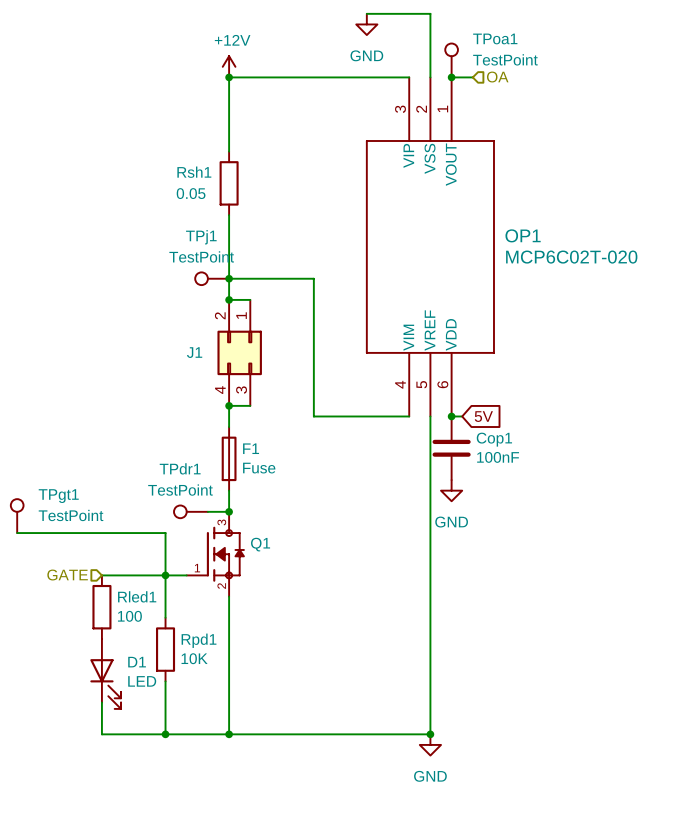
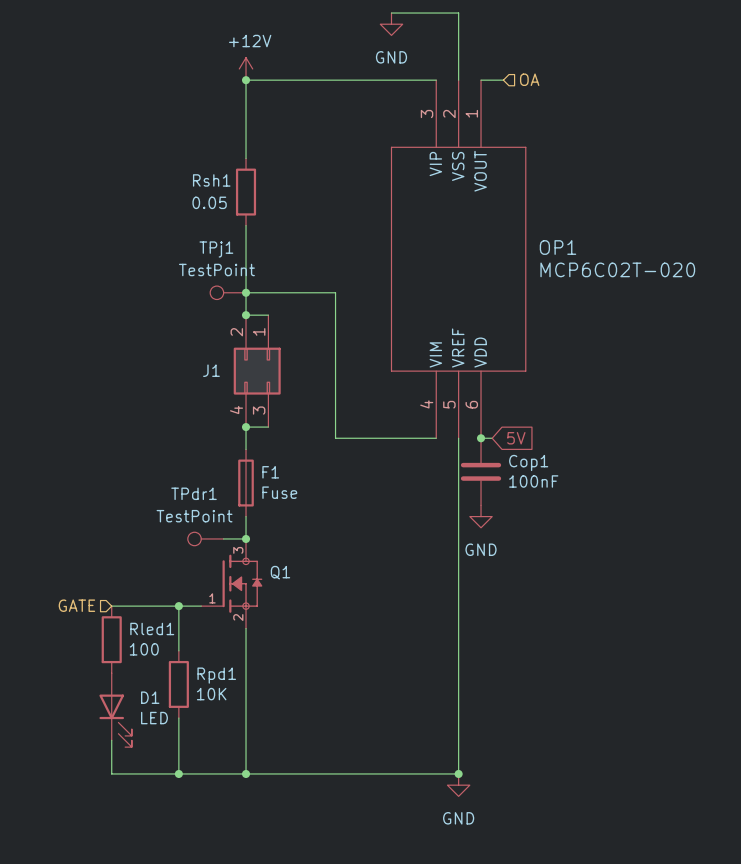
TPoa1: TestPoint (451, 60) -> none
junction: (451, 77) -> none
TPgt1: TestPoint (17, 516) -> none
wire: (17, 533) (165, 533) (165, 575) -> none

